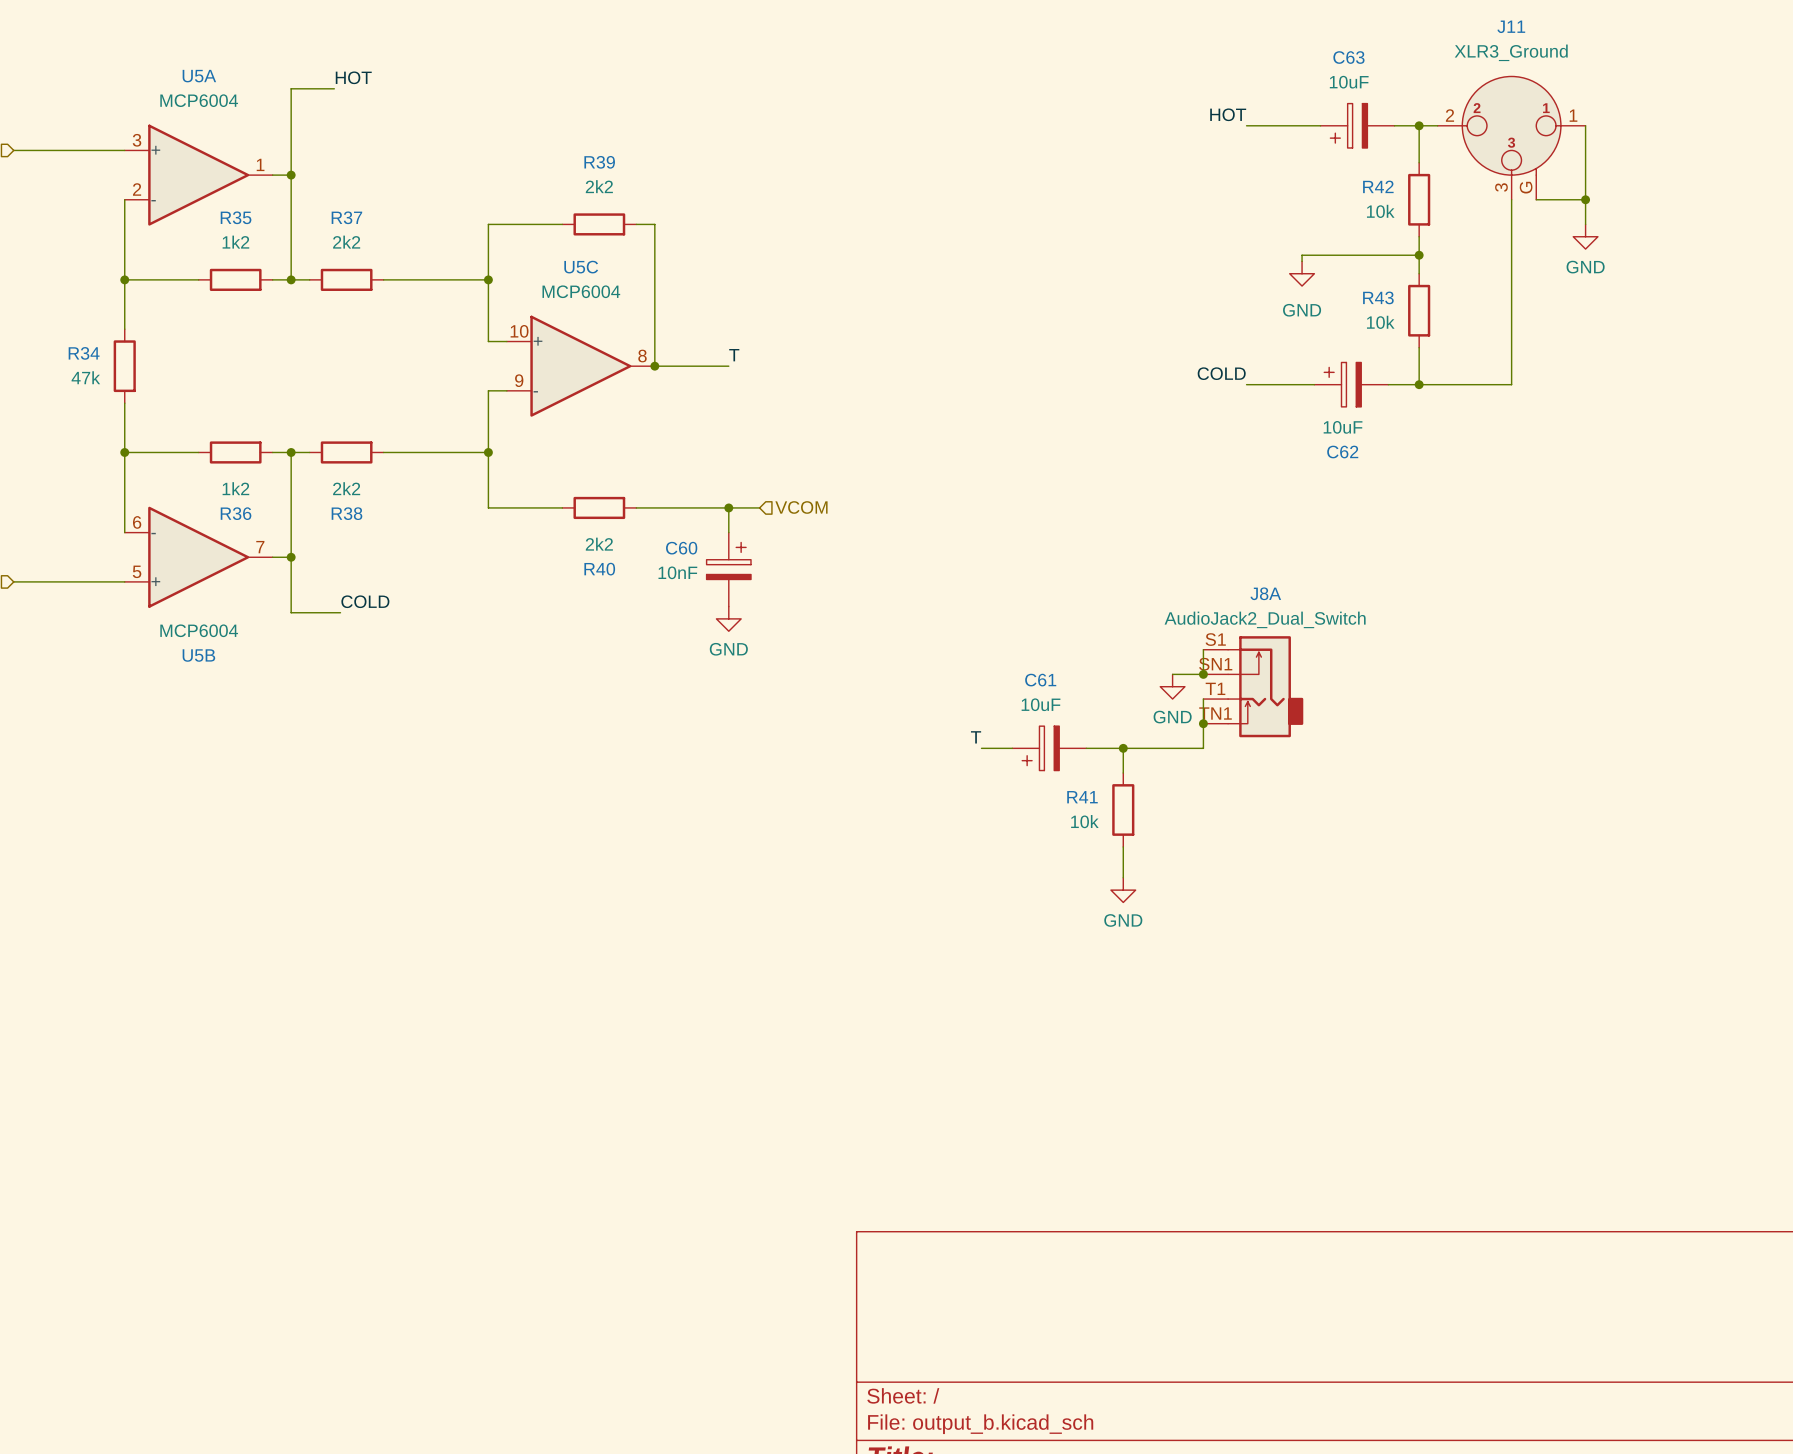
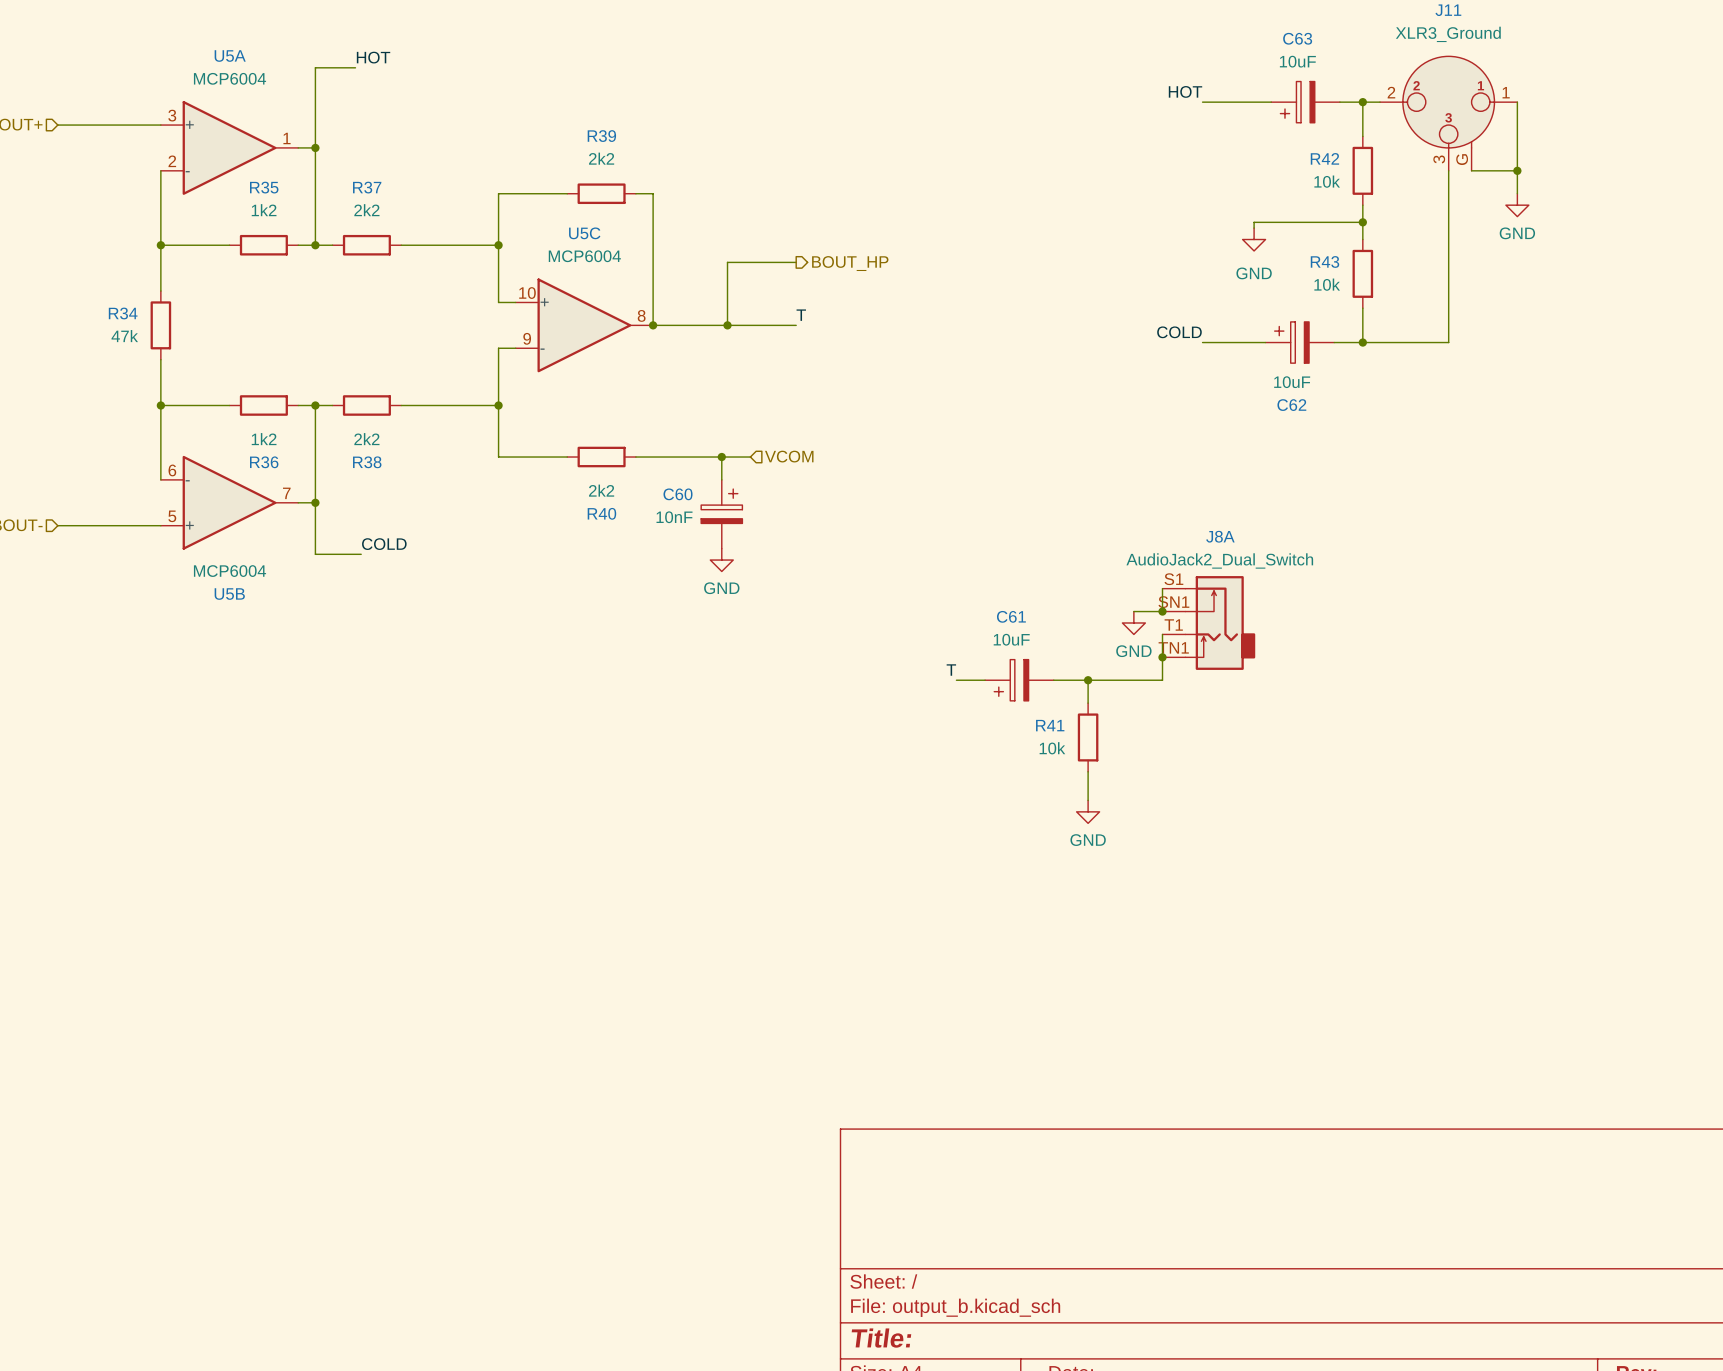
wire: none -> (796, 262) (727, 262) (727, 325)
hierarchical label: none -> BOUT_HP (850, 263)
label position: T (734, 355) -> T (801, 315)
wire: none -> (721, 325) (796, 325)
junction: none -> (727, 325)

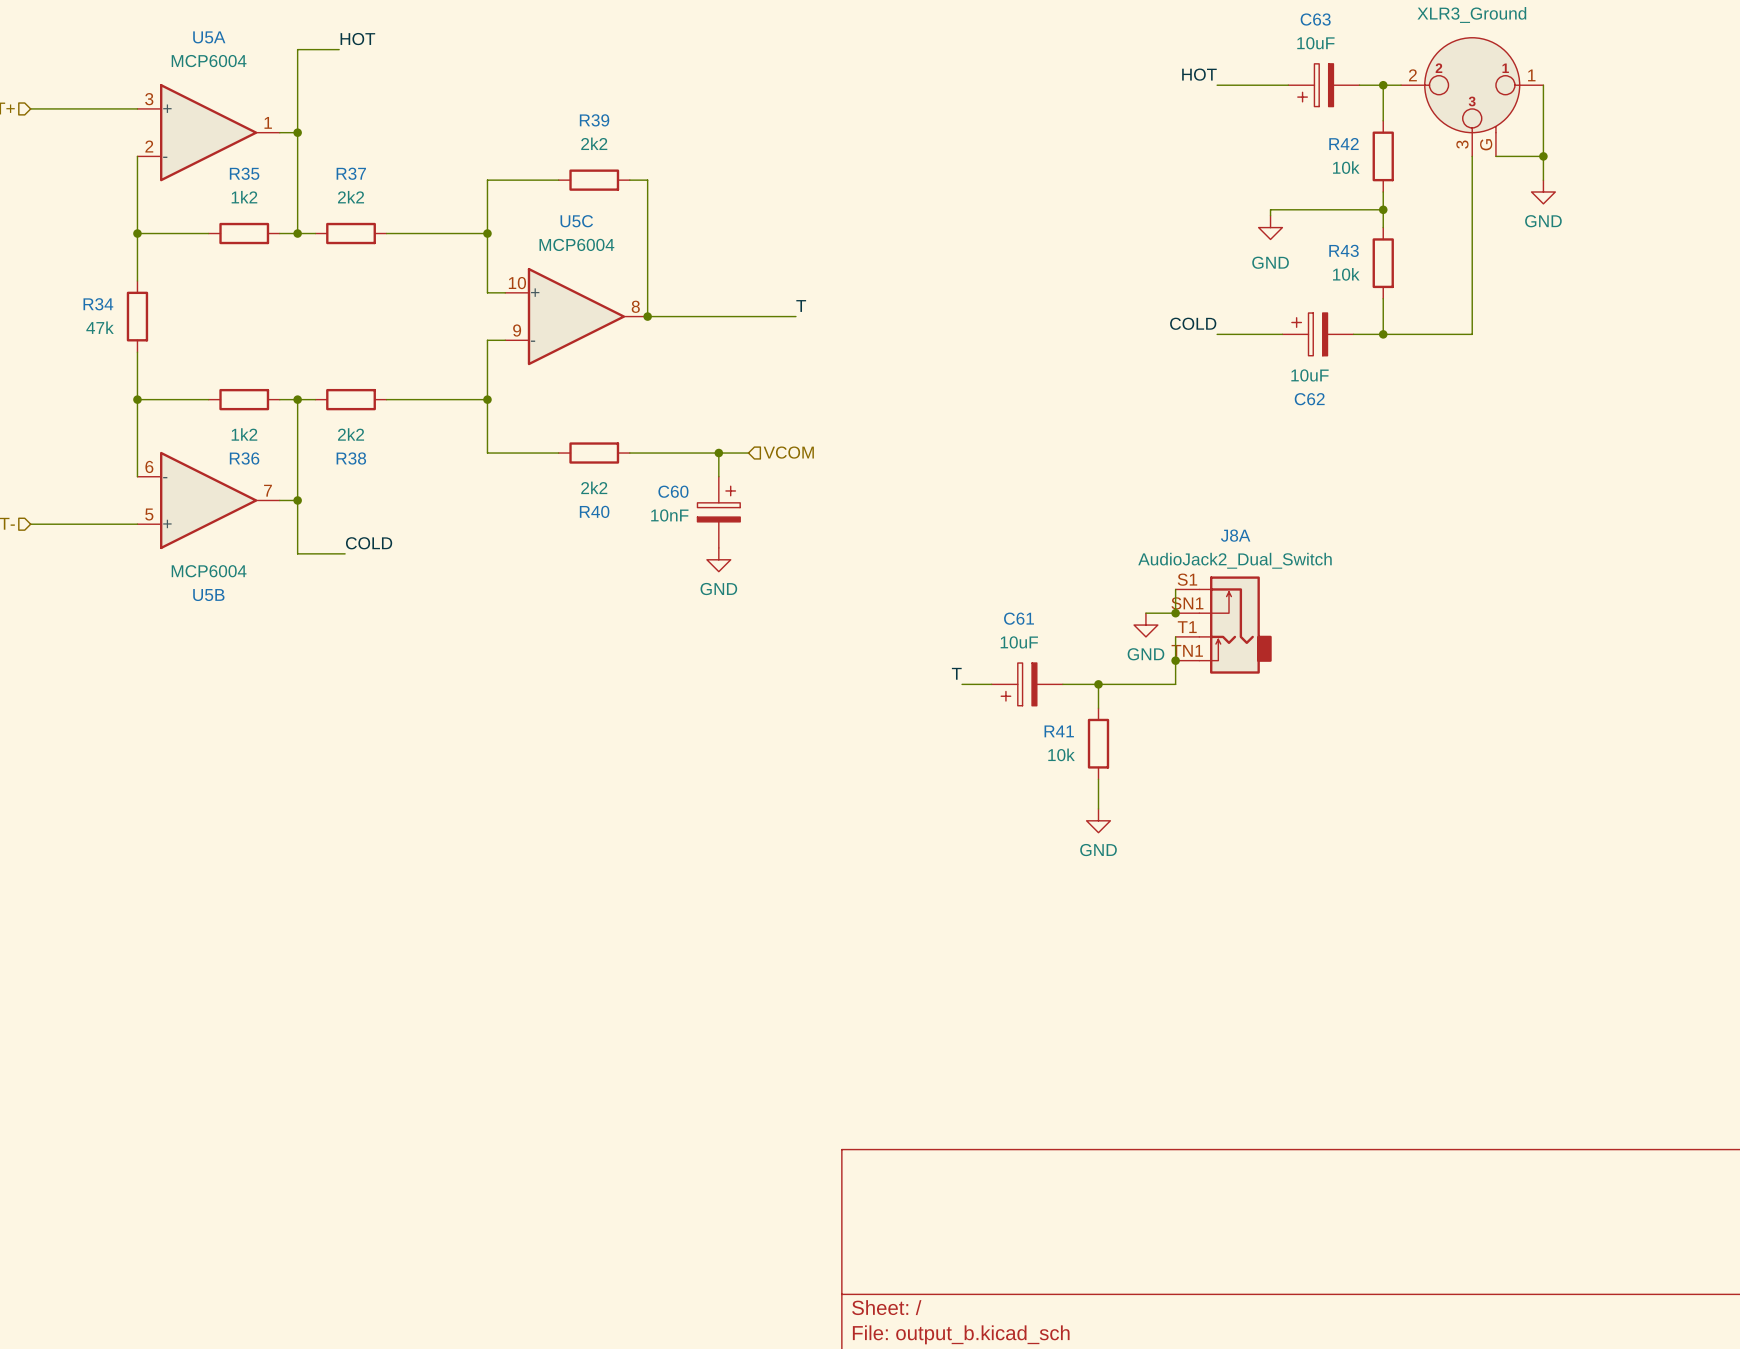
wire: (796, 262) (727, 262) (727, 325) -> none
hierarchical label: BOUT_HP (850, 263) -> none
junction: (727, 325) -> none

